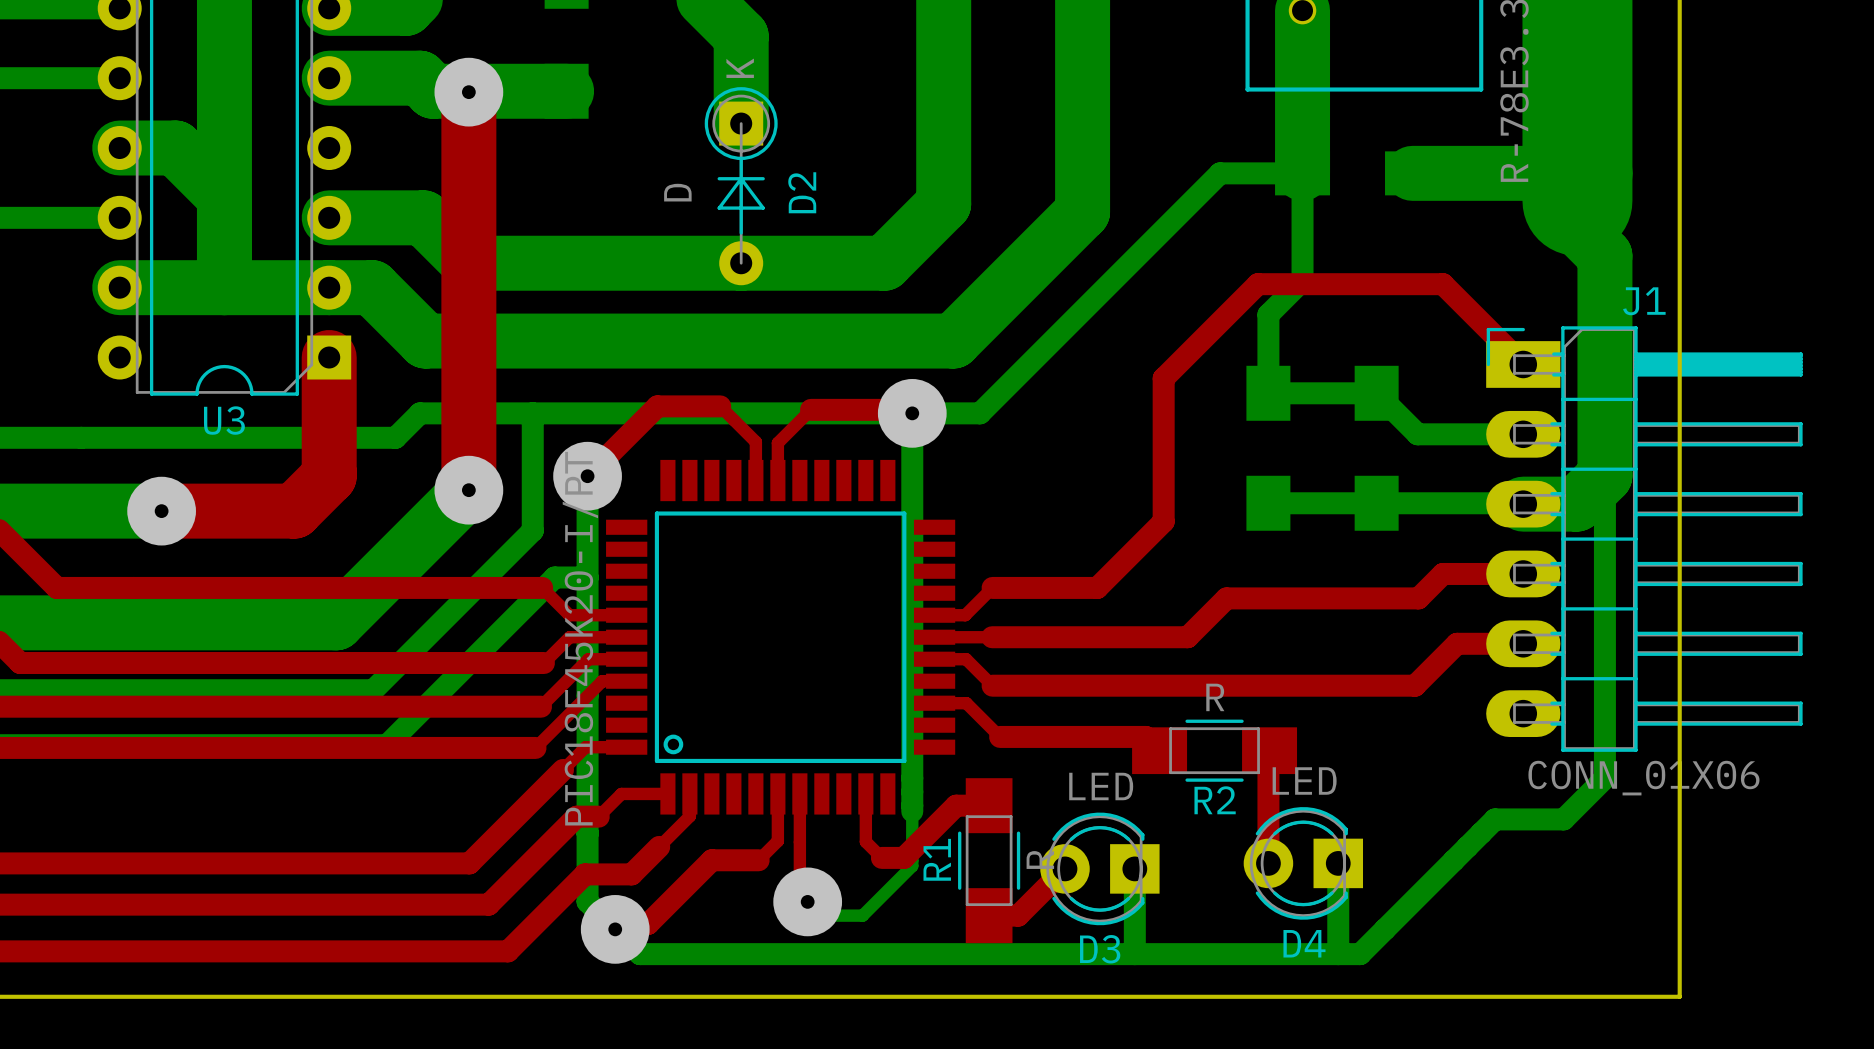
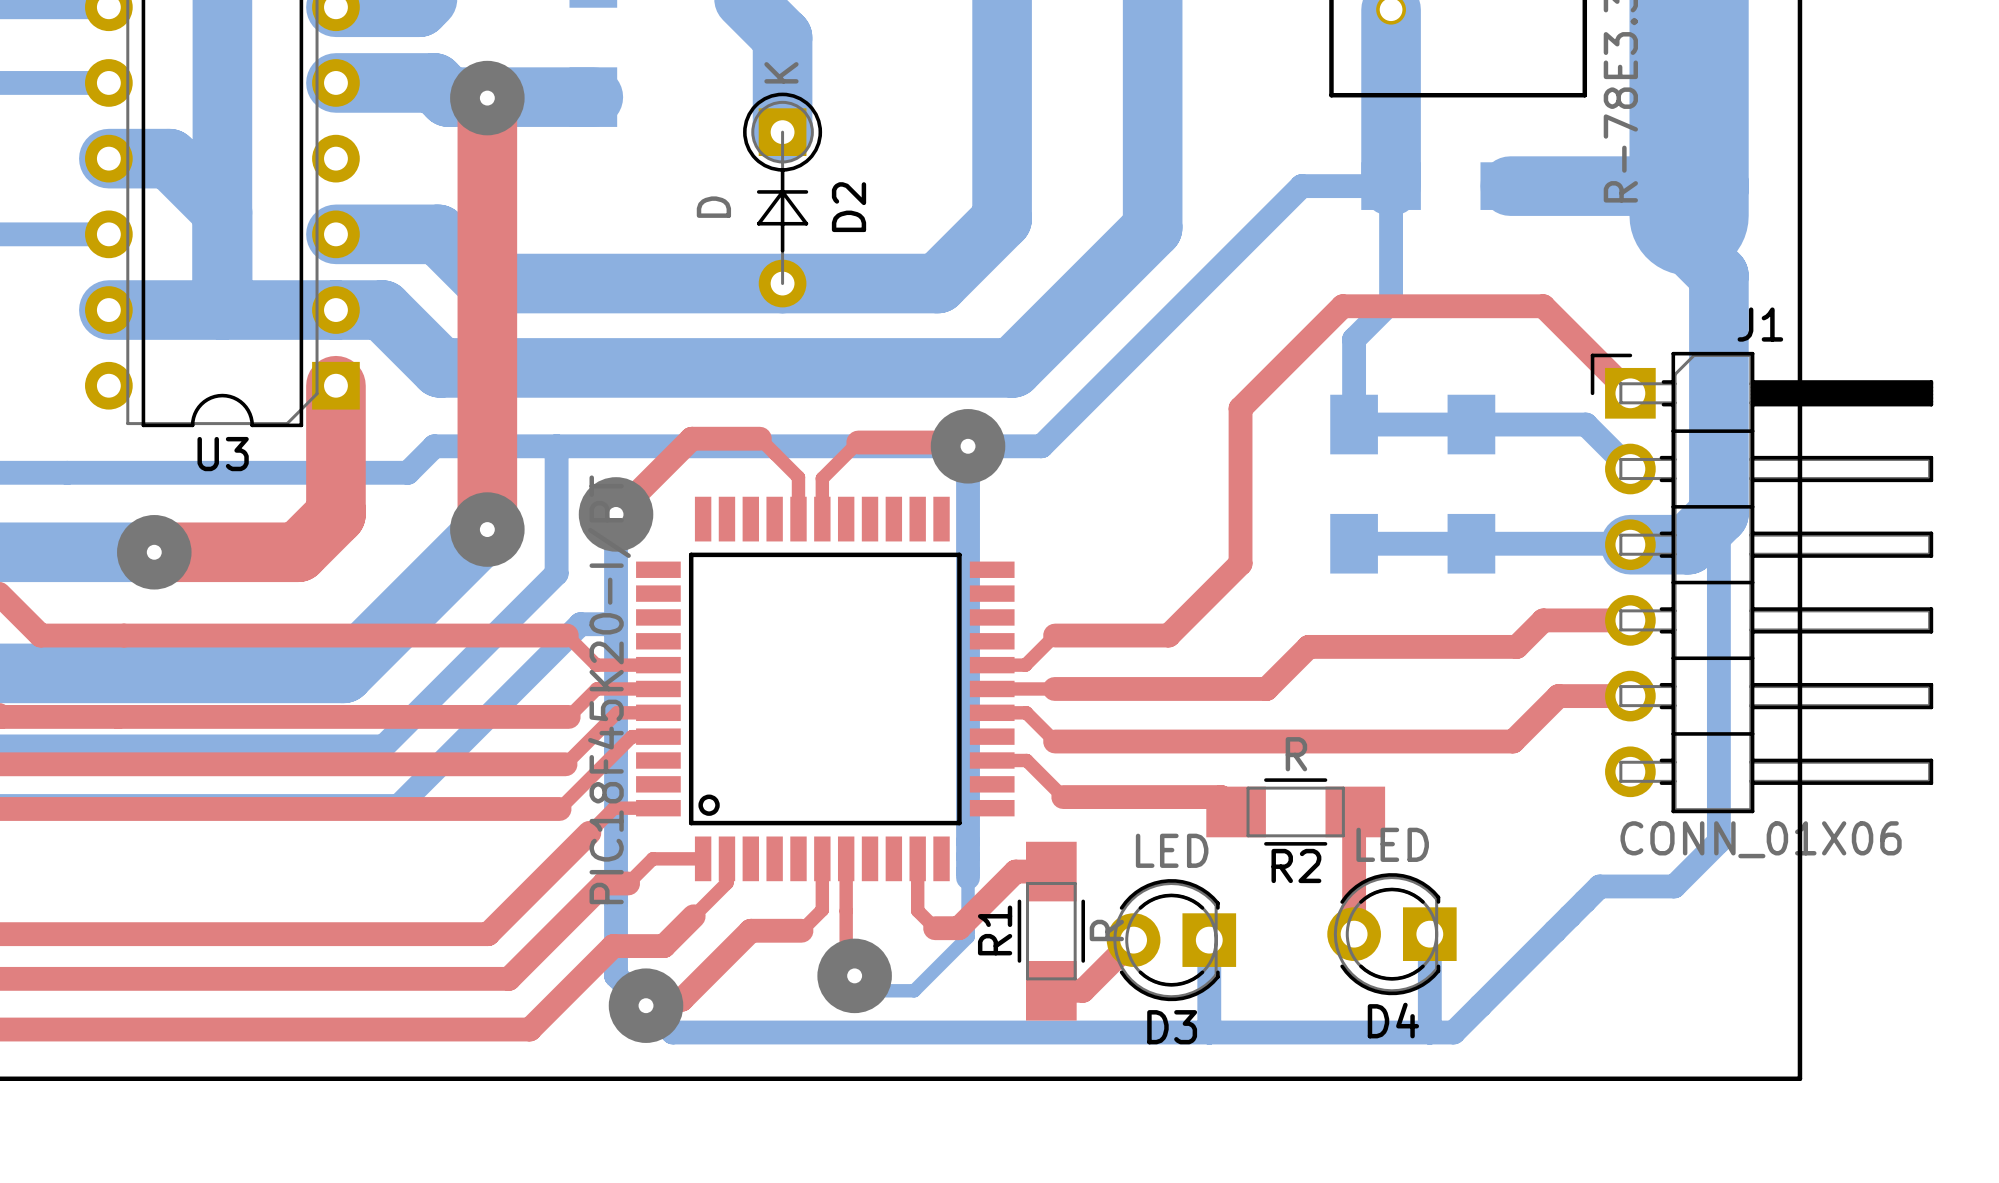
J1 footprint: [1486, 326, 1803, 752] -> [1590, 351, 1934, 814]
bottom track: (1376, 393) (1417, 434) (1523, 434) -> (1471, 424) (1585, 424) (1630, 469)

